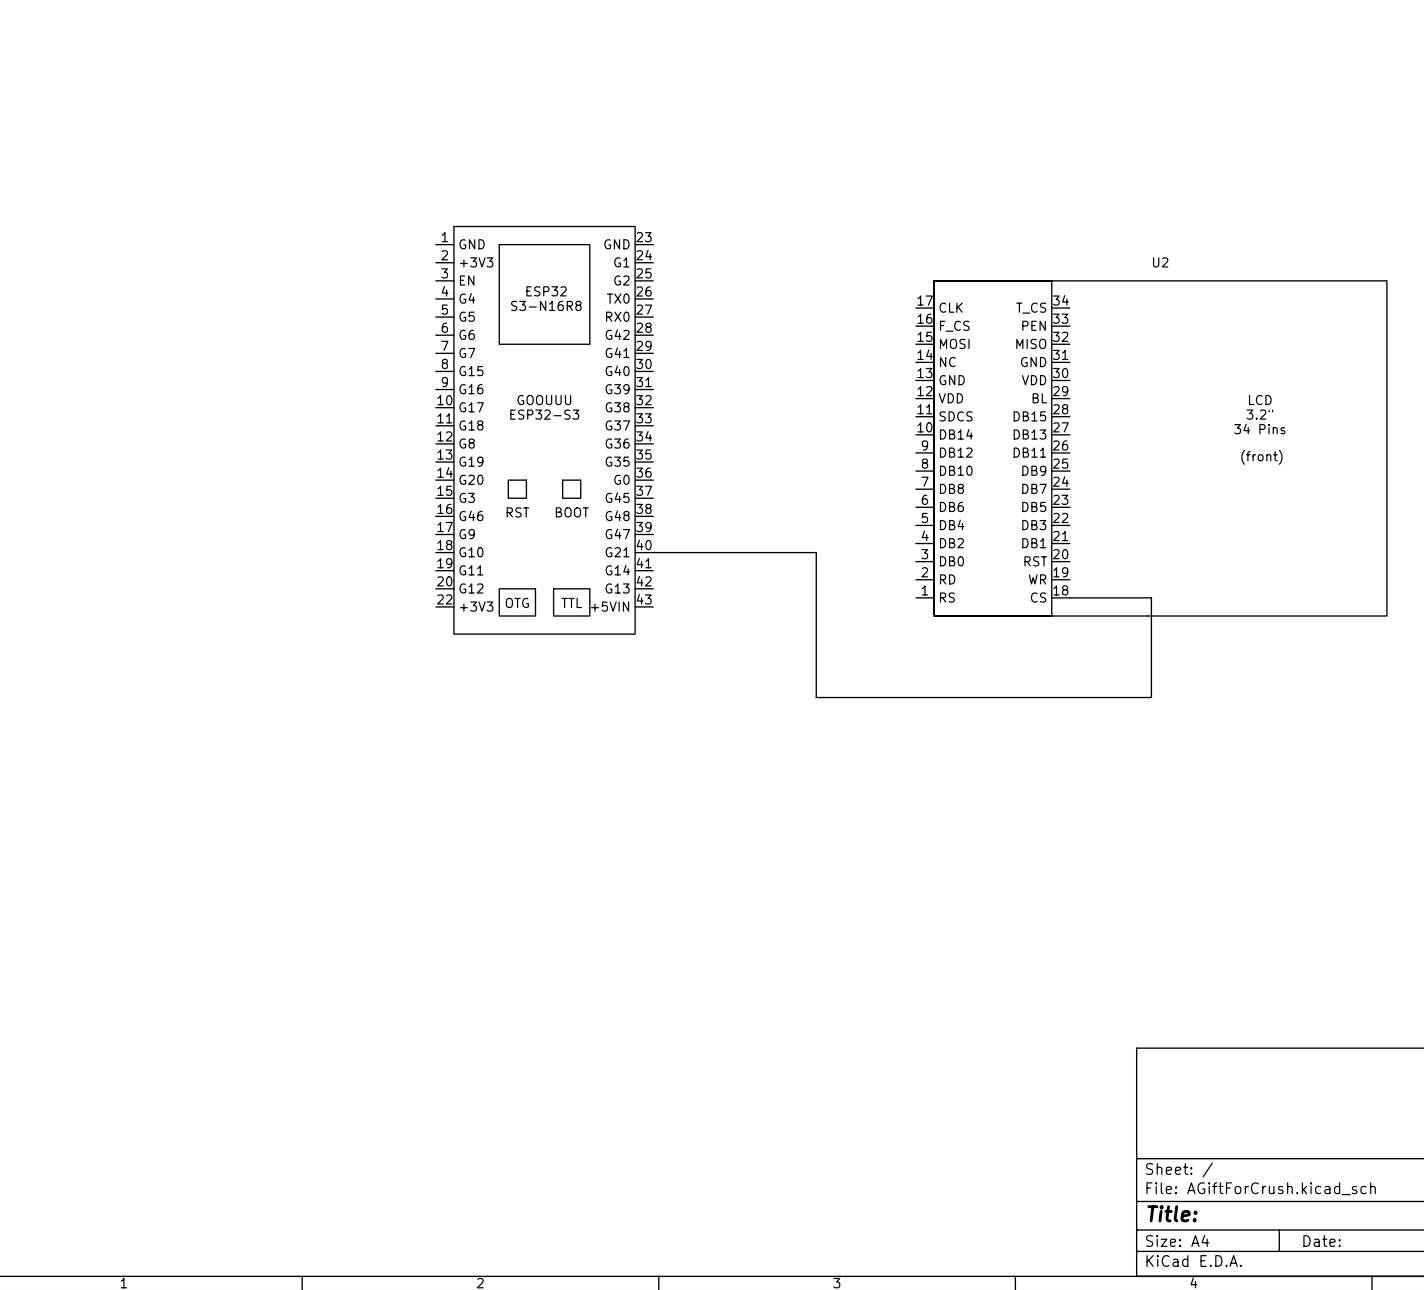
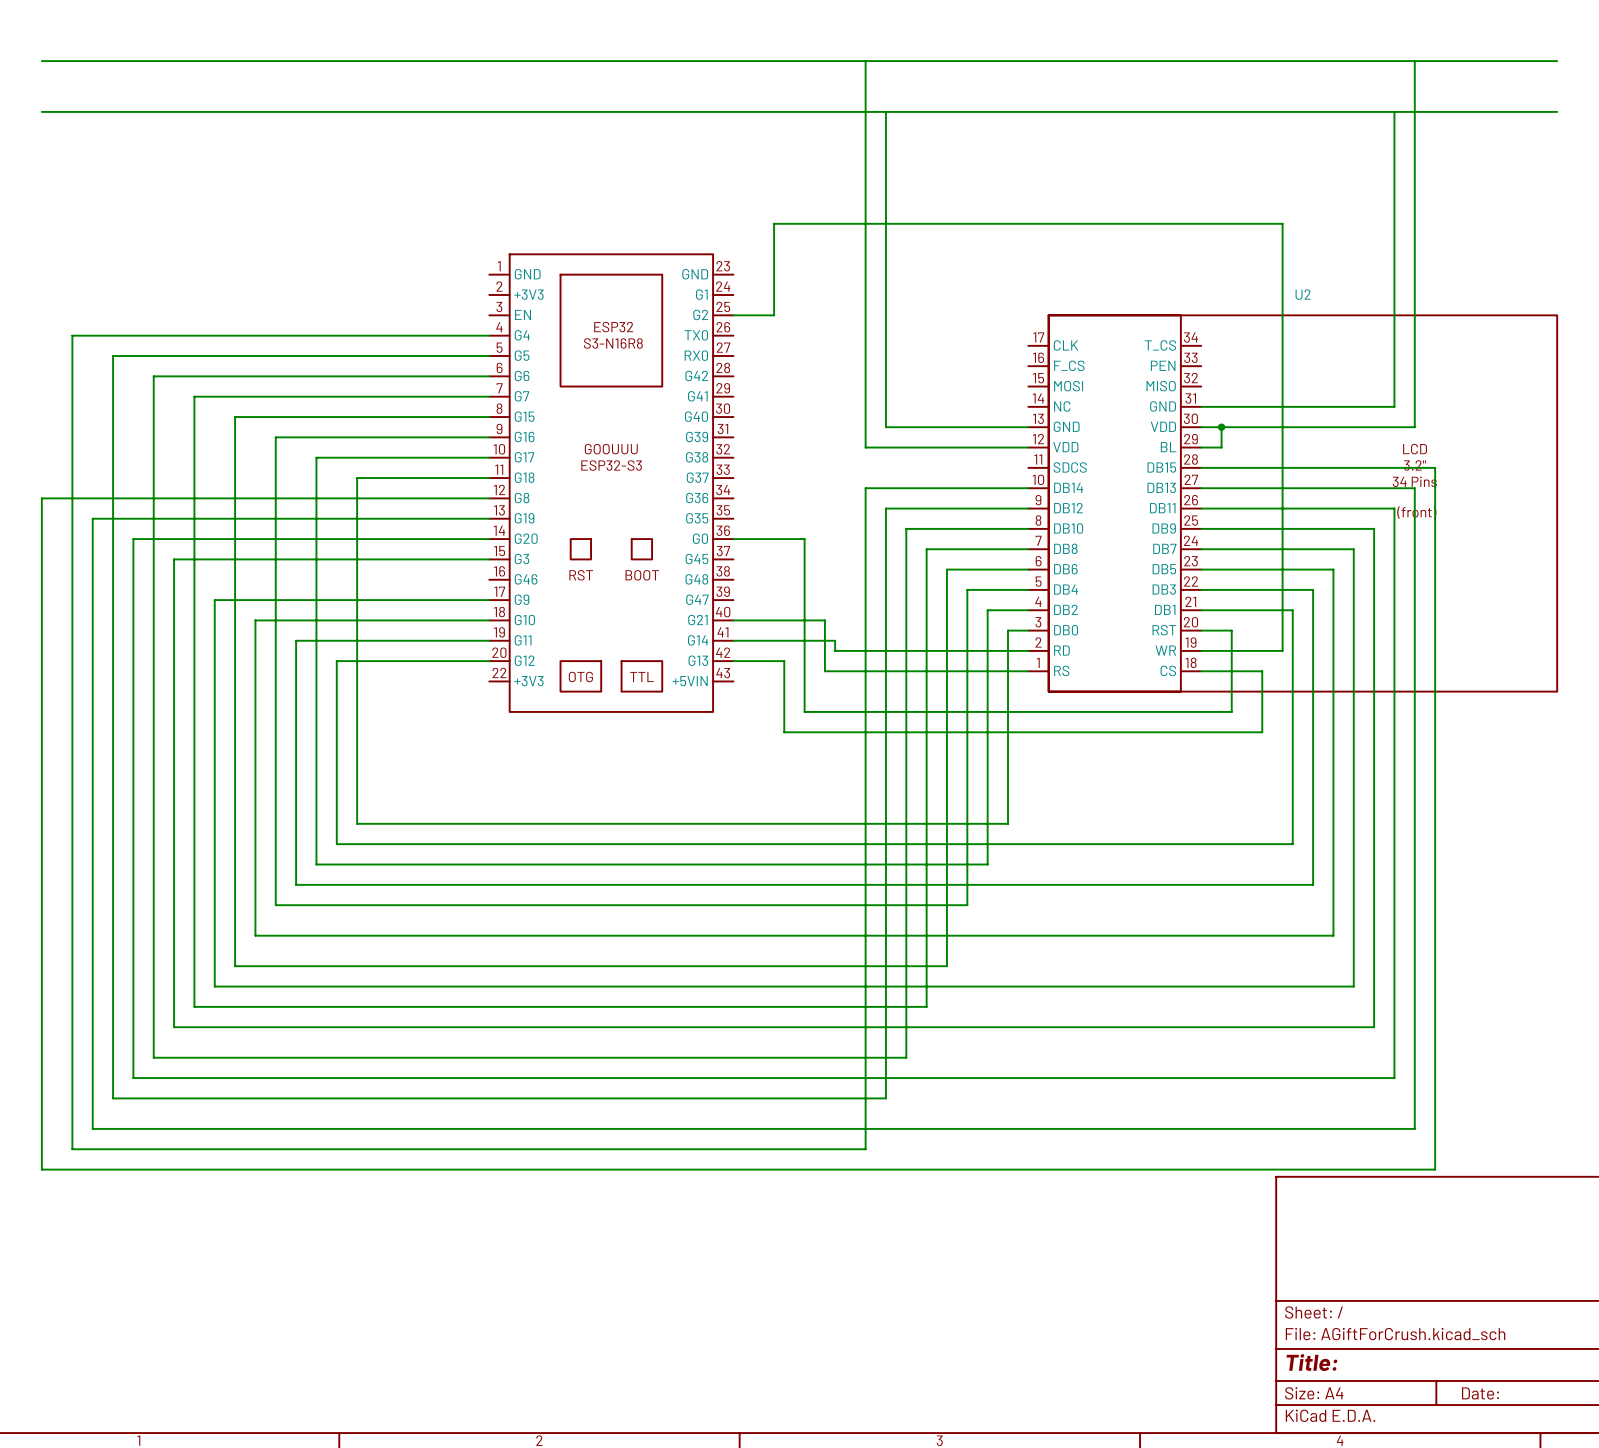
wire: none -> (41, 61) (1557, 61)
wire: none -> (865, 61) (865, 447) (1028, 447)
wire: none -> (1414, 61) (1414, 427) (1201, 427)
wire: none -> (41, 111) (1557, 111)
wire: none -> (885, 111) (885, 427) (1028, 427)
wire: none -> (1394, 111) (1394, 406) (1201, 406)
wire: none -> (733, 315) (774, 315) (774, 223) (1282, 223) (1282, 650) (1201, 650)
wire: none -> (489, 335) (72, 335) (72, 1149) (865, 1149) (865, 488) (1028, 488)
wire: none -> (489, 356) (113, 356) (113, 1098) (885, 1098) (885, 508) (1028, 508)
wire: none -> (489, 376) (153, 376) (153, 1057) (906, 1057) (906, 528) (1028, 528)
wire: none -> (489, 396) (194, 396) (194, 1006) (926, 1006) (926, 549) (1028, 549)
wire: none -> (489, 417) (235, 417) (235, 966) (946, 966) (946, 569) (1028, 569)
wire: none -> (1221, 427) (1221, 447) (1201, 447)
junction: none -> (1221, 427)
wire: none -> (489, 437) (275, 437) (275, 905) (967, 905) (967, 589) (1028, 589)
wire: none -> (489, 457) (316, 457) (316, 864) (987, 864) (987, 610) (1028, 610)
wire: none -> (1201, 467) (1435, 467) (1435, 1169) (41, 1169) (41, 498) (489, 498)
wire: none -> (489, 478) (357, 478) (357, 823) (1008, 823) (1008, 630) (1028, 630)
wire: none -> (1201, 488) (1414, 488) (1414, 1128) (92, 1128) (92, 518) (489, 518)
wire: none -> (1201, 508) (1394, 508) (1394, 1078) (133, 1078) (133, 539) (489, 539)
wire: none -> (1201, 528) (1374, 528) (1374, 1027) (174, 1027) (174, 559) (489, 559)
wire: none -> (733, 539) (804, 539) (804, 711) (1231, 711) (1231, 630) (1201, 630)
wire: none -> (1201, 549) (1353, 549) (1353, 986) (214, 986) (214, 600) (489, 600)
wire: none -> (1201, 569) (1333, 569) (1333, 935) (255, 935) (255, 620) (489, 620)
wire: none -> (1201, 589) (1313, 589) (1313, 884) (296, 884) (296, 640) (489, 640)
wire: (734, 552) (816, 552) (816, 697) (1151, 697) -> (824, 620) (824, 671) (1028, 671)
wire: none -> (733, 640) (835, 640) (835, 650) (1028, 650)
wire: none -> (489, 661) (336, 661) (336, 844) (1292, 844) (1292, 783)
wire: none -> (733, 661) (784, 661) (784, 732) (1262, 732) (1262, 671)
wire: (1124, 597) (1151, 597) -> (1201, 610) (1292, 610) (1292, 671)

